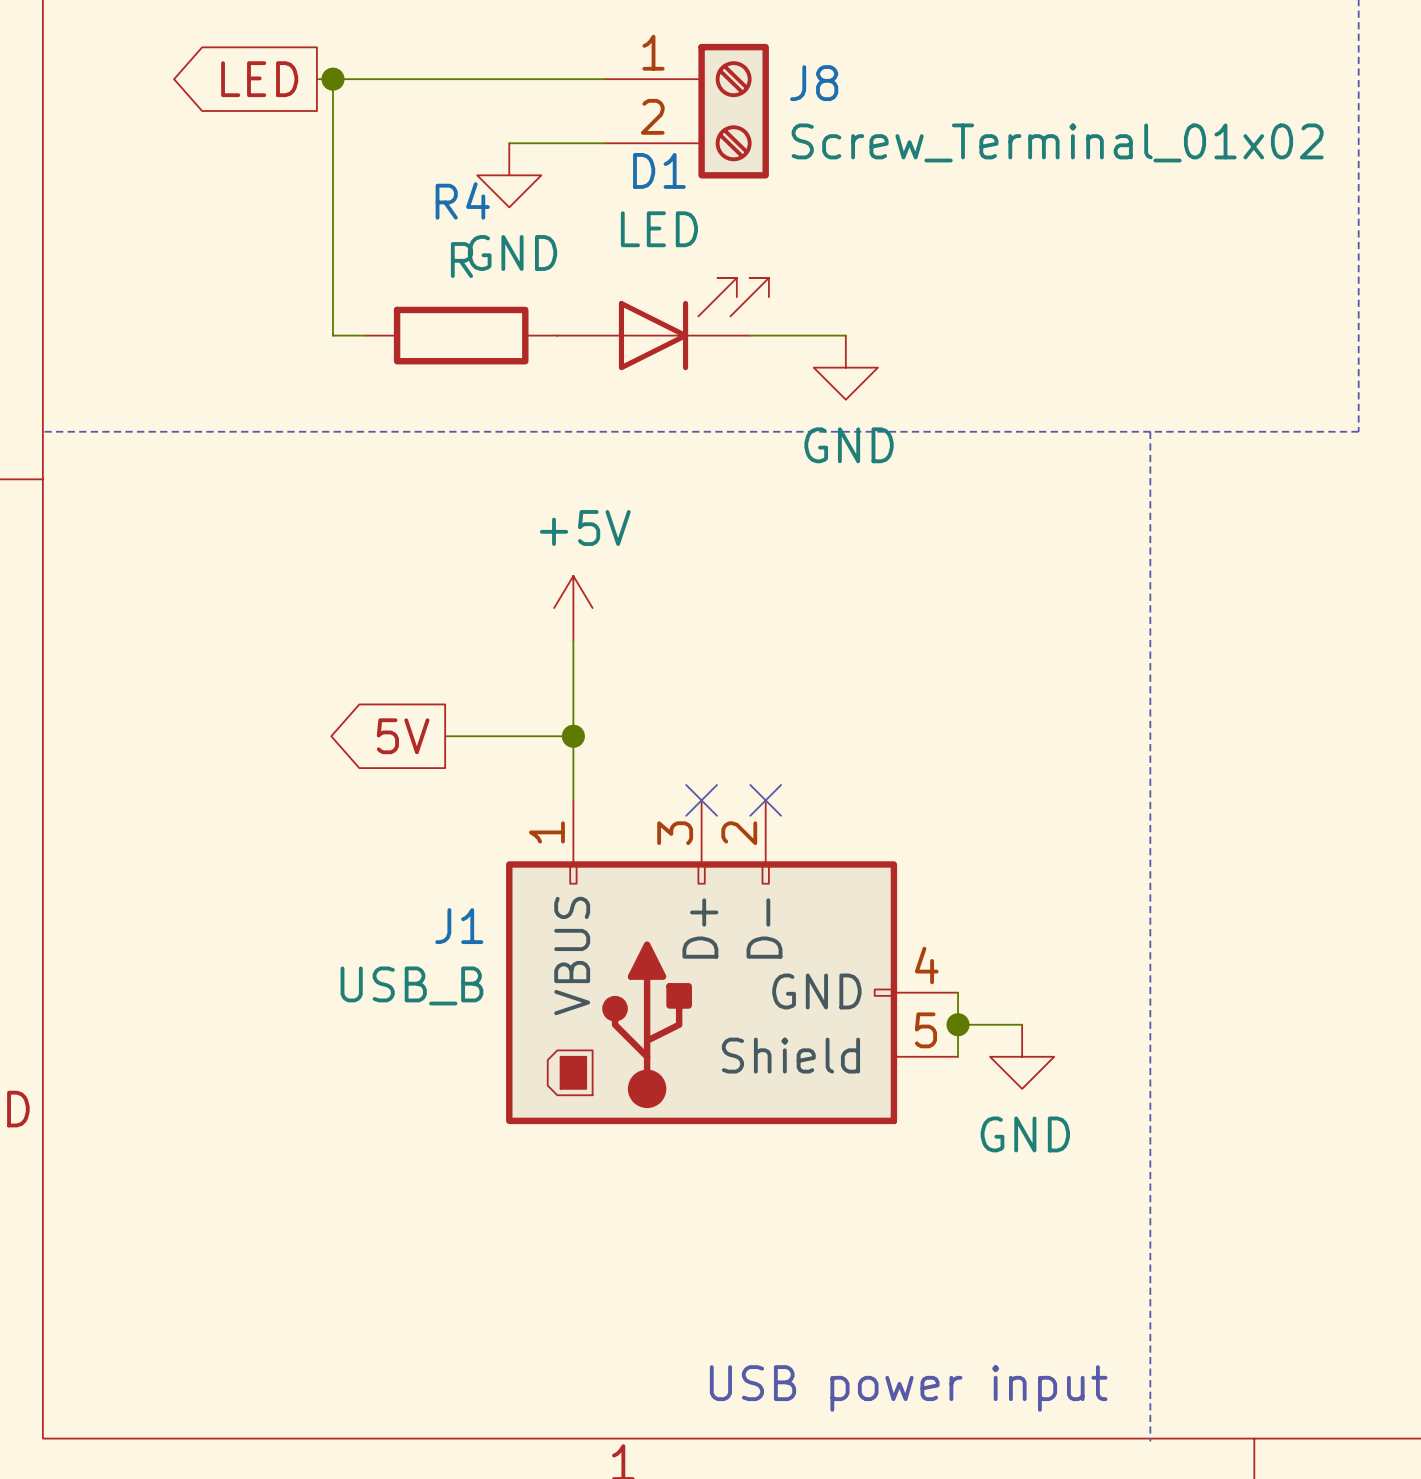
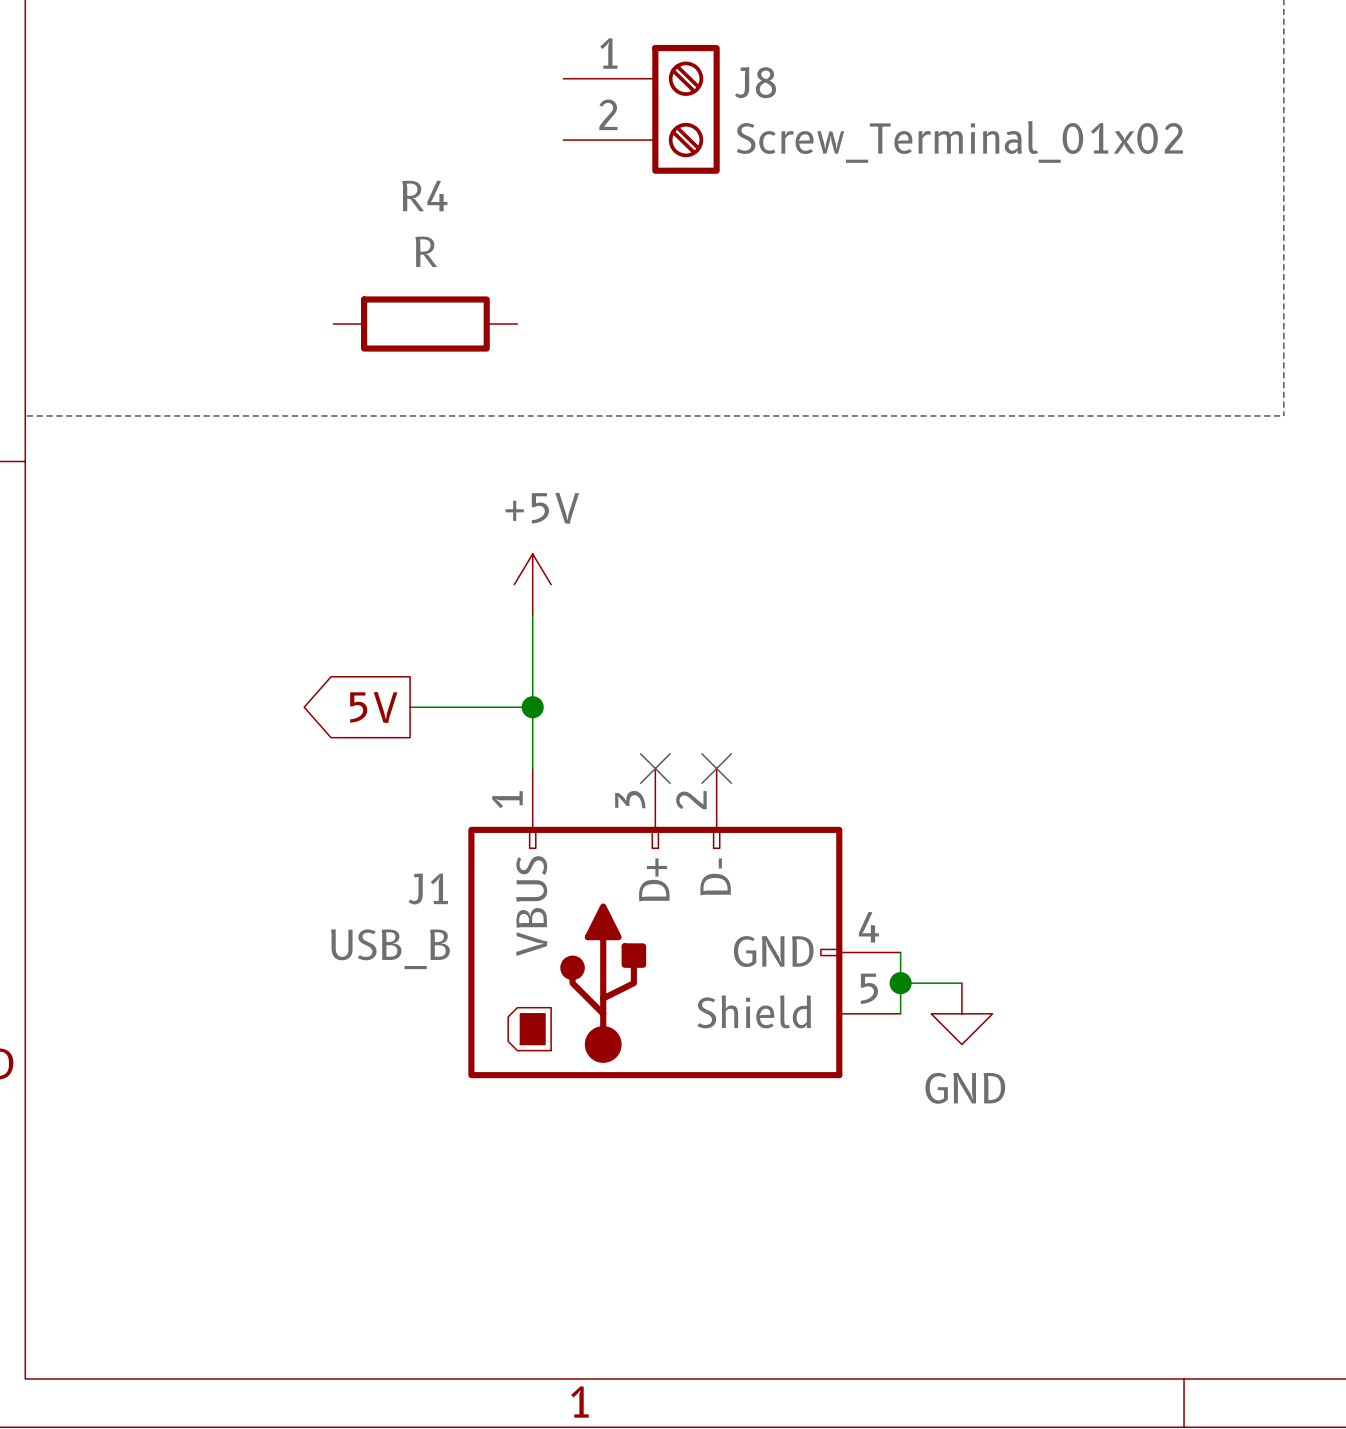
global label: LED (259, 79) -> none
wire: (316, 79) (605, 79) -> none
wire: (332, 79) (332, 335) (365, 335) -> none
junction: (332, 79) -> none
wire: (509, 143) (605, 143) -> none
power symbol: GND (509, 175) -> none
D1: LED (663, 324) -> none
wire: (749, 335) (845, 335) -> none
power symbol: GND (845, 367) -> none
line: (1150, 431) (1150, 1441) -> none
text: USB power input (908, 1388) -> none

